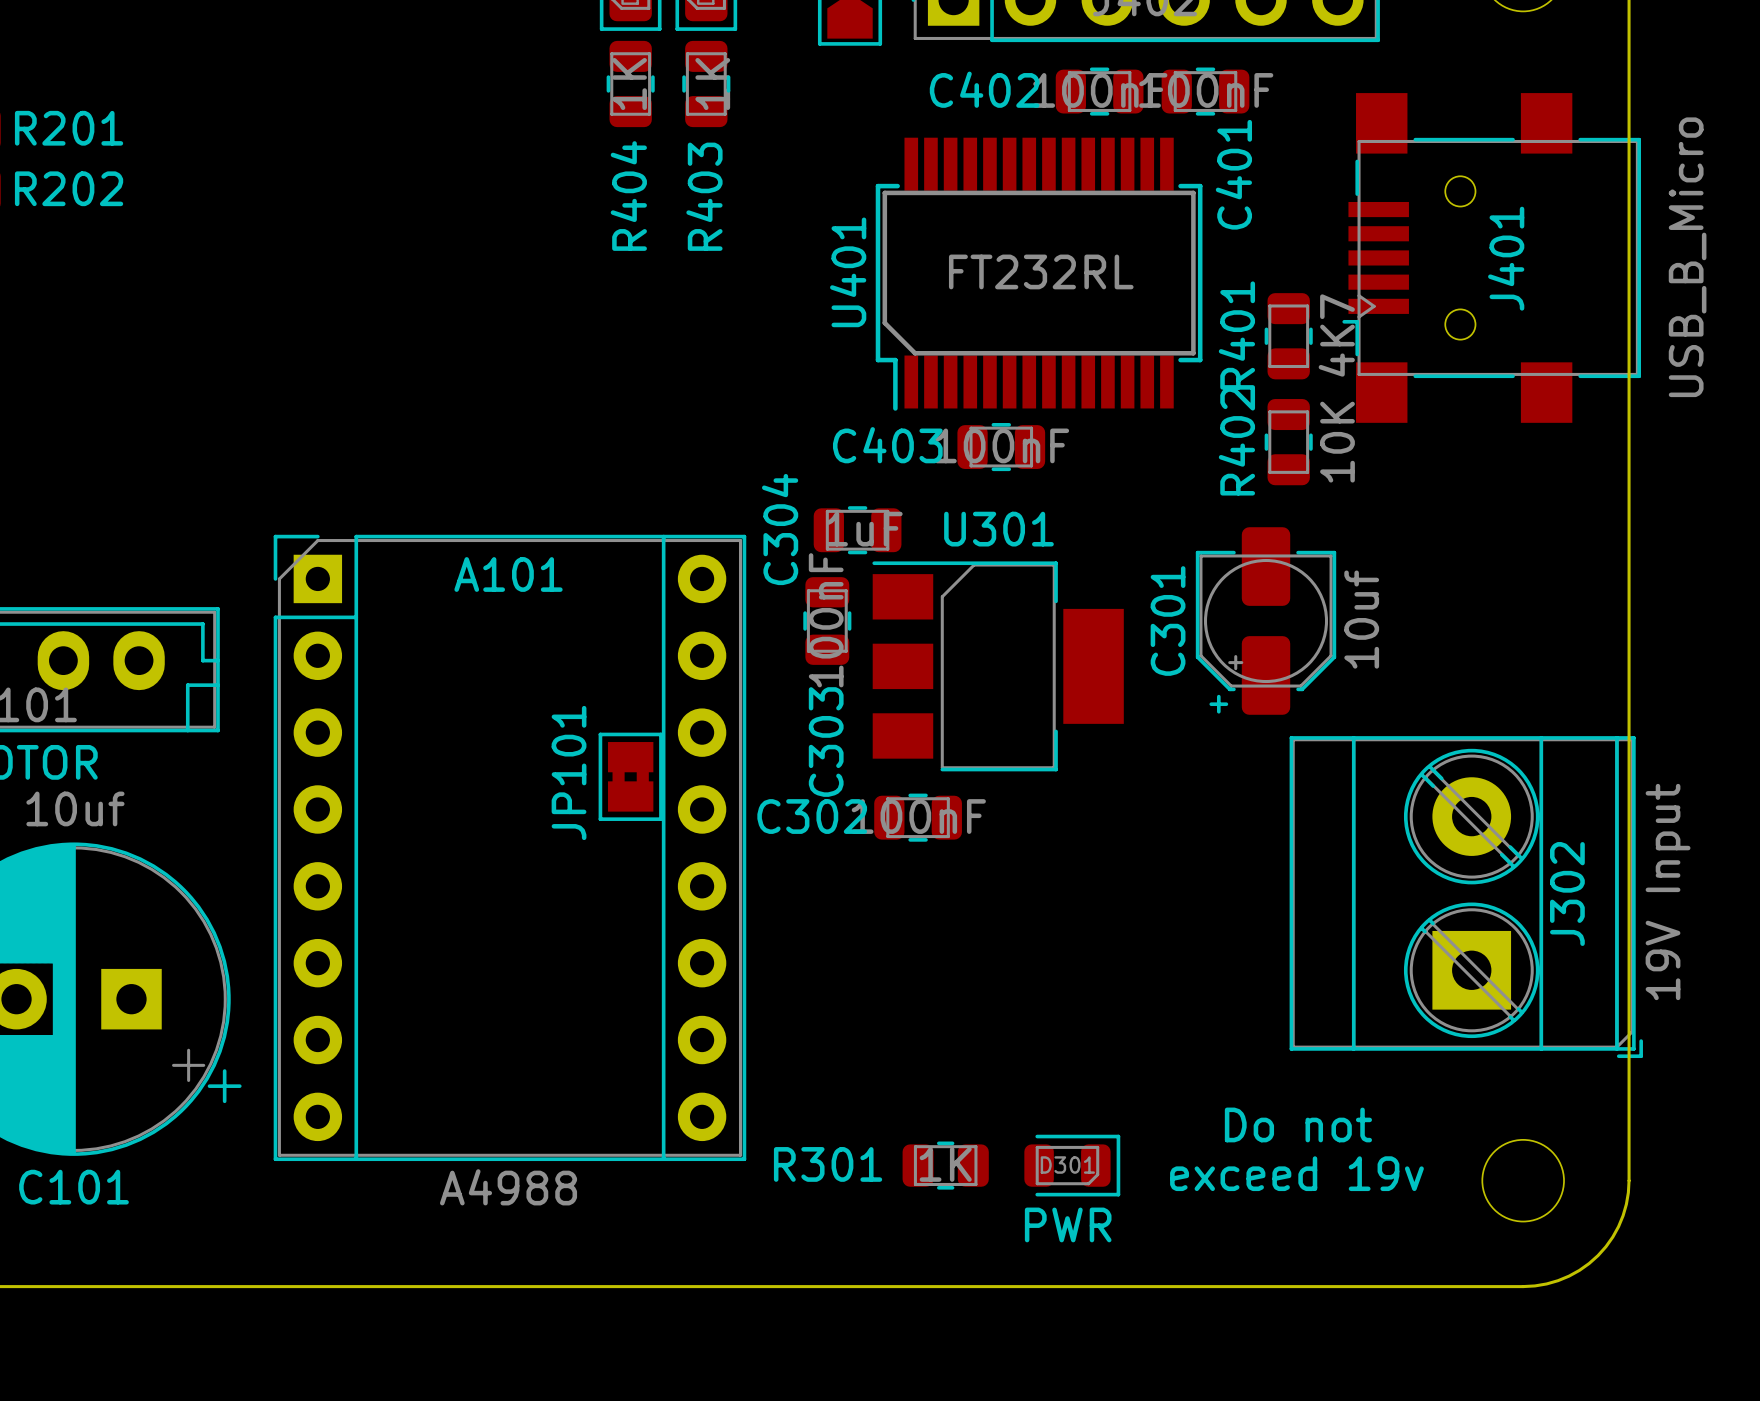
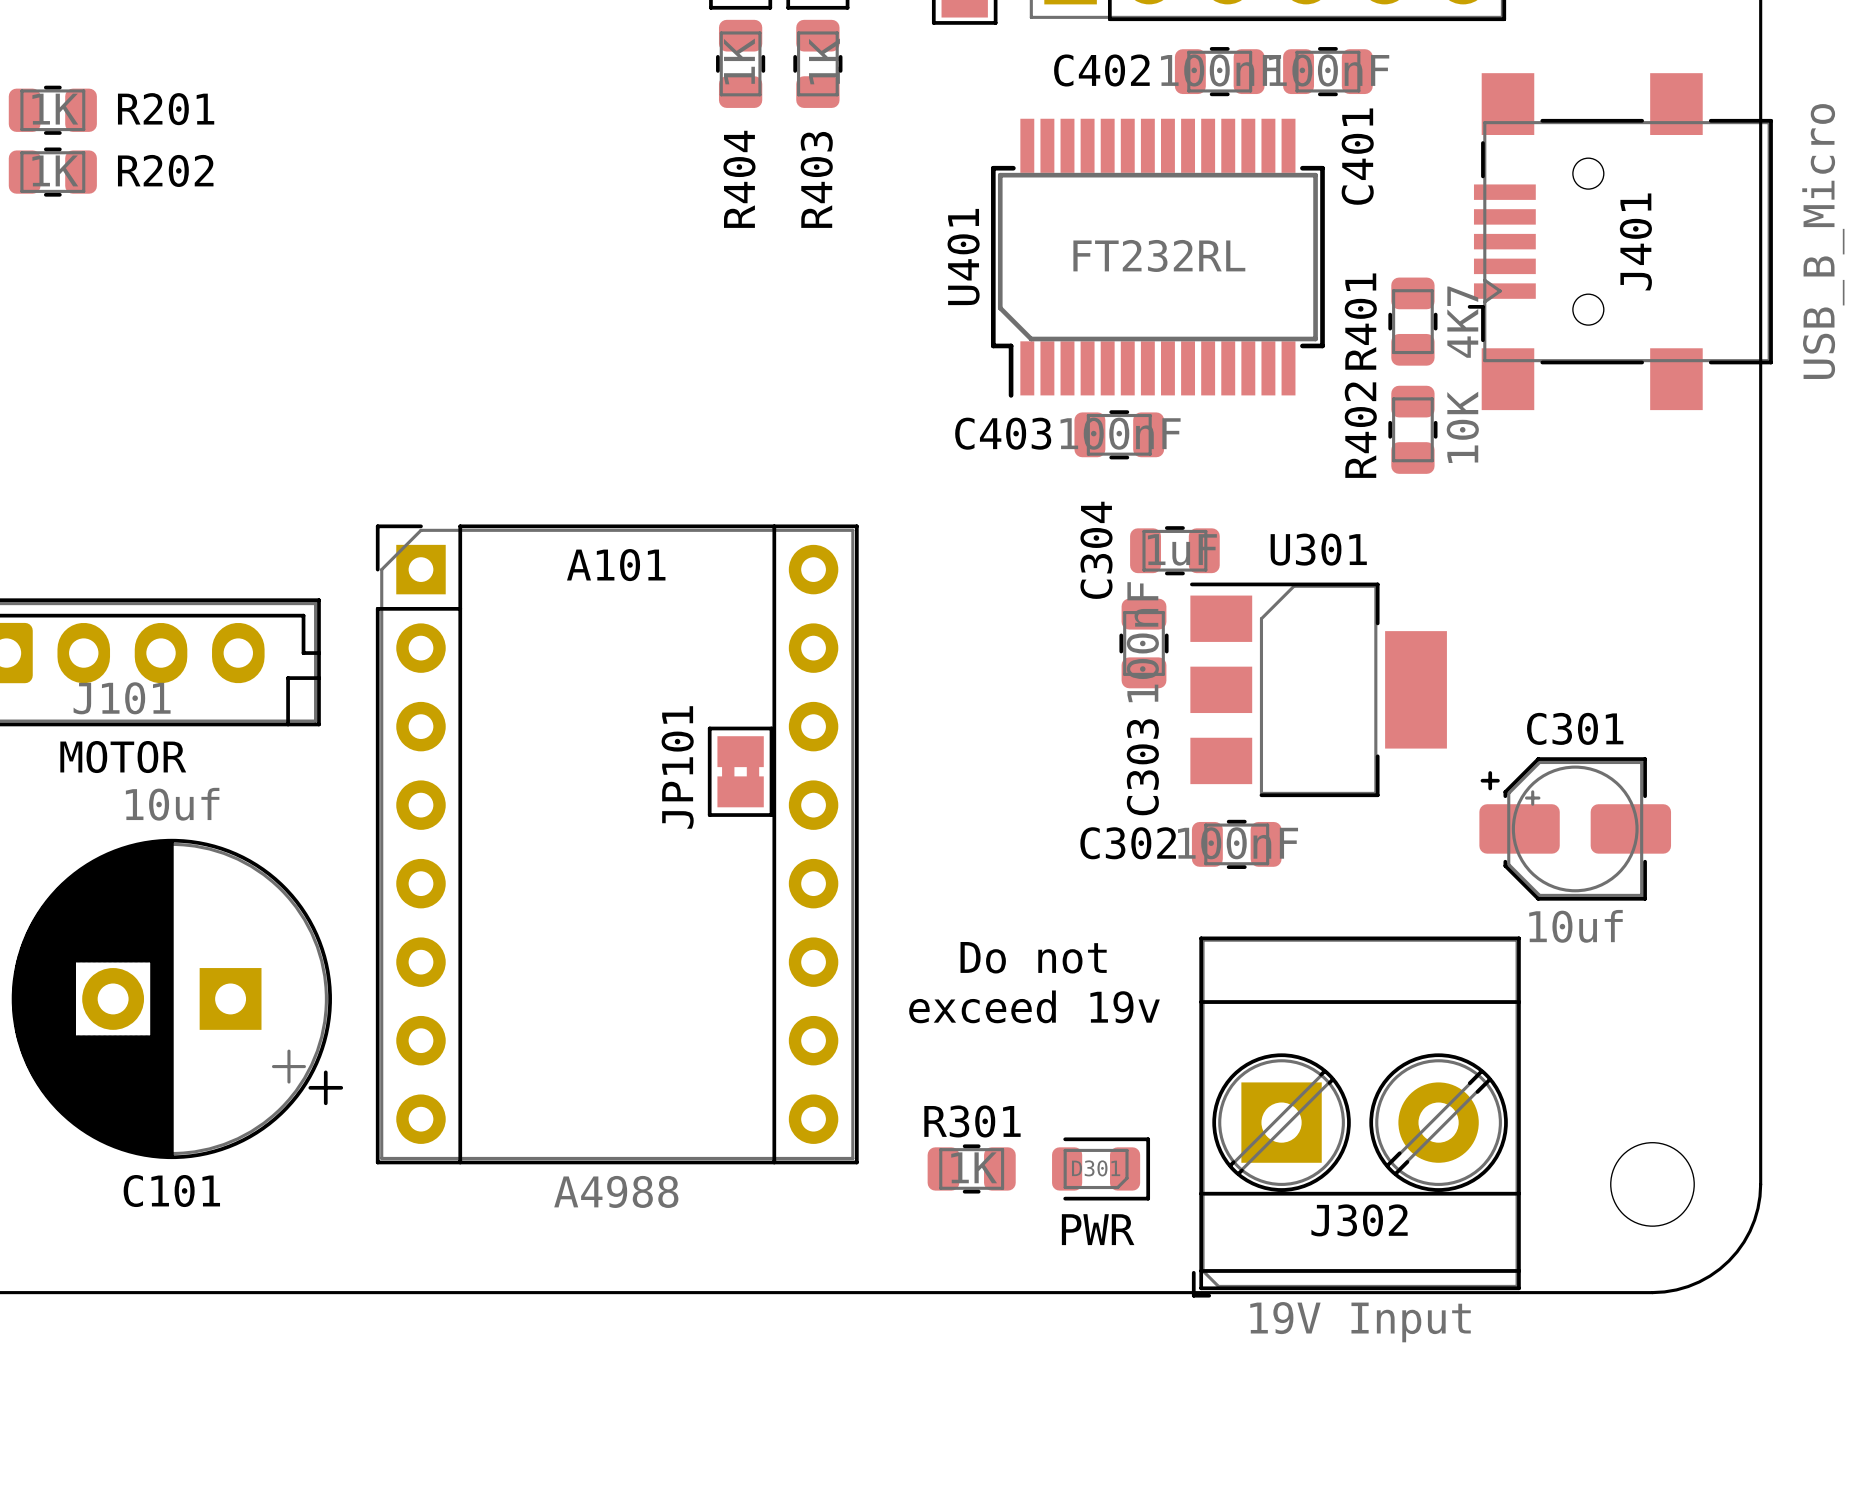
C304 position: (857, 530) -> (1174, 550)
C303 position: (827, 621) -> (1144, 643)
C301 rotation: 0° (1266, 621) -> 90° clockwise (1575, 828)
C301 position: (1266, 621) -> (1575, 828)
U301 position: (998, 666) -> (1318, 689)
C302 position: (918, 817) -> (1236, 844)
J302 rotation: 0° (1466, 897) -> 90° clockwise (1356, 1117)
J302 position: (1466, 897) -> (1356, 1117)
text position: Do not (1298, 1124) -> Do not (1033, 957)
R301 name position: R301 (828, 1164) -> R301 (972, 1121)
R301 position: (945, 1165) -> (971, 1168)
D301 position: (1072, 1165) -> (1101, 1168)
text position: exceed 19v (1296, 1173) -> exceed 19v (1034, 1006)

